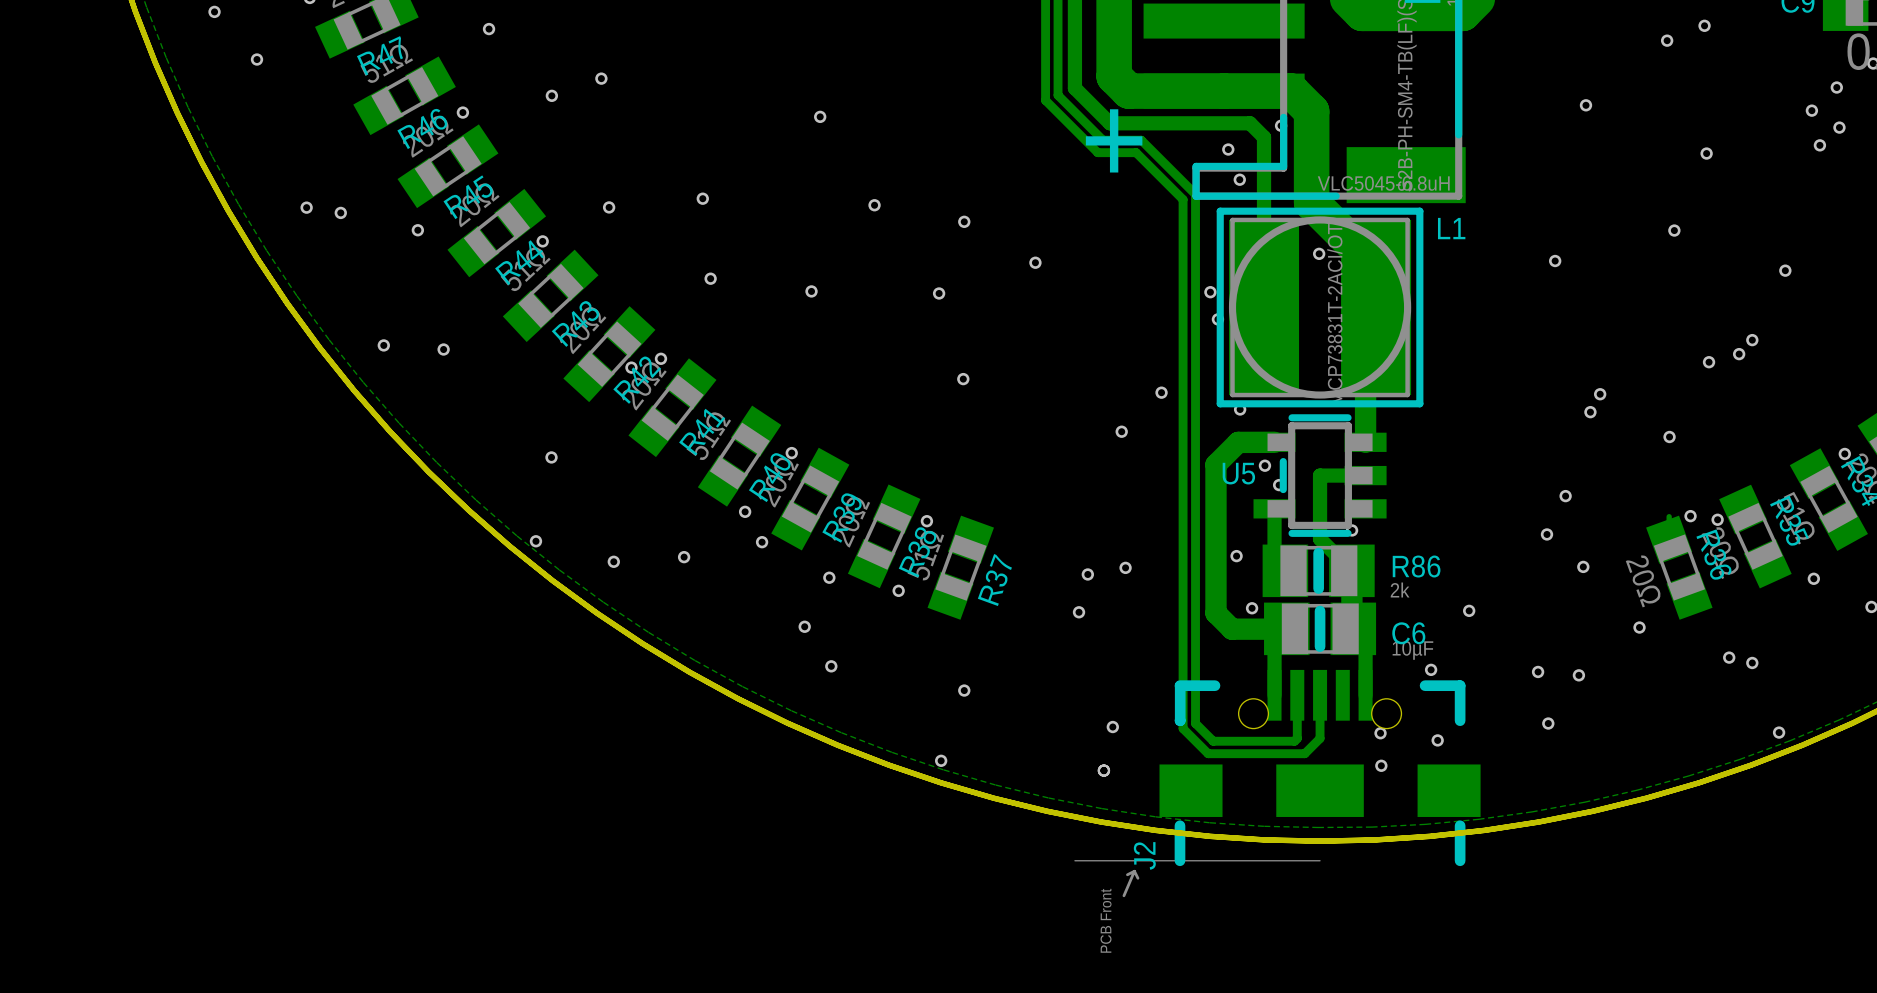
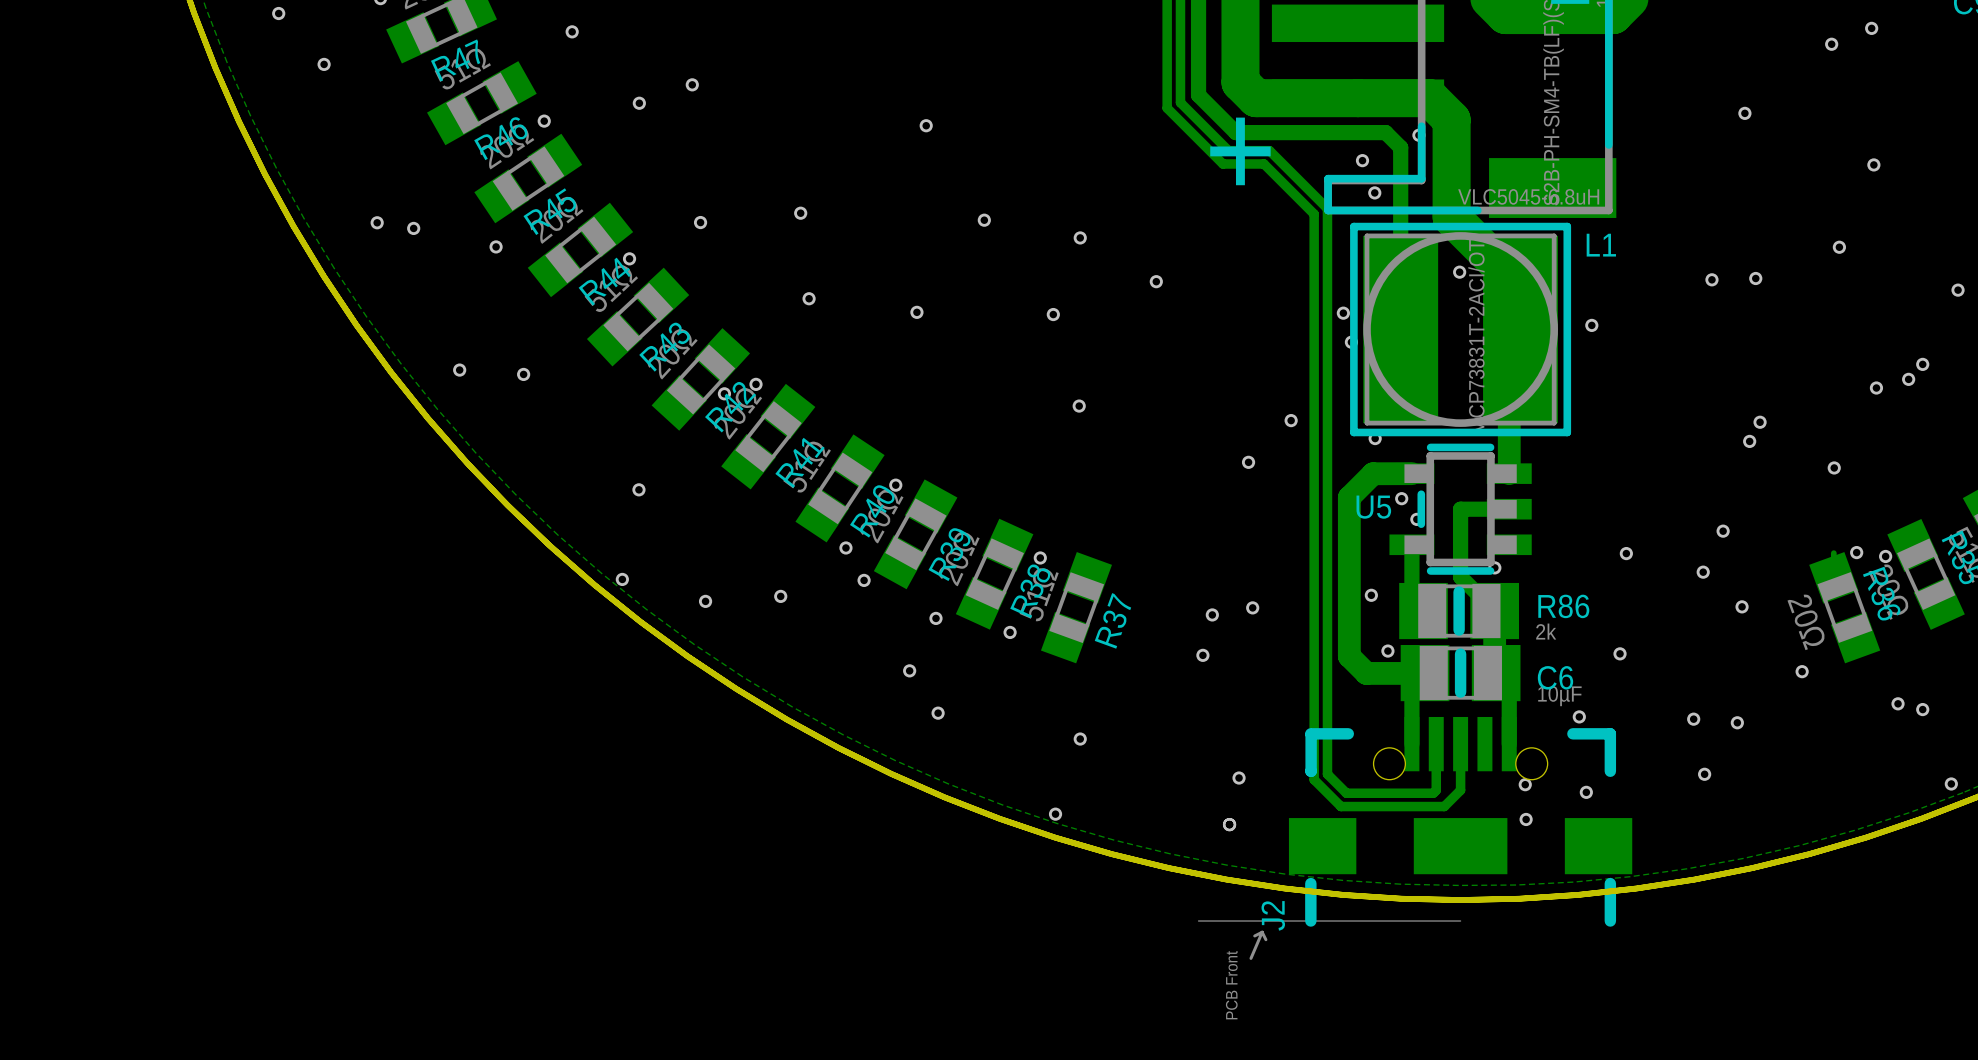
via: none -> (1755, 278)
via: none -> (1591, 325)
via: none -> (1626, 553)

